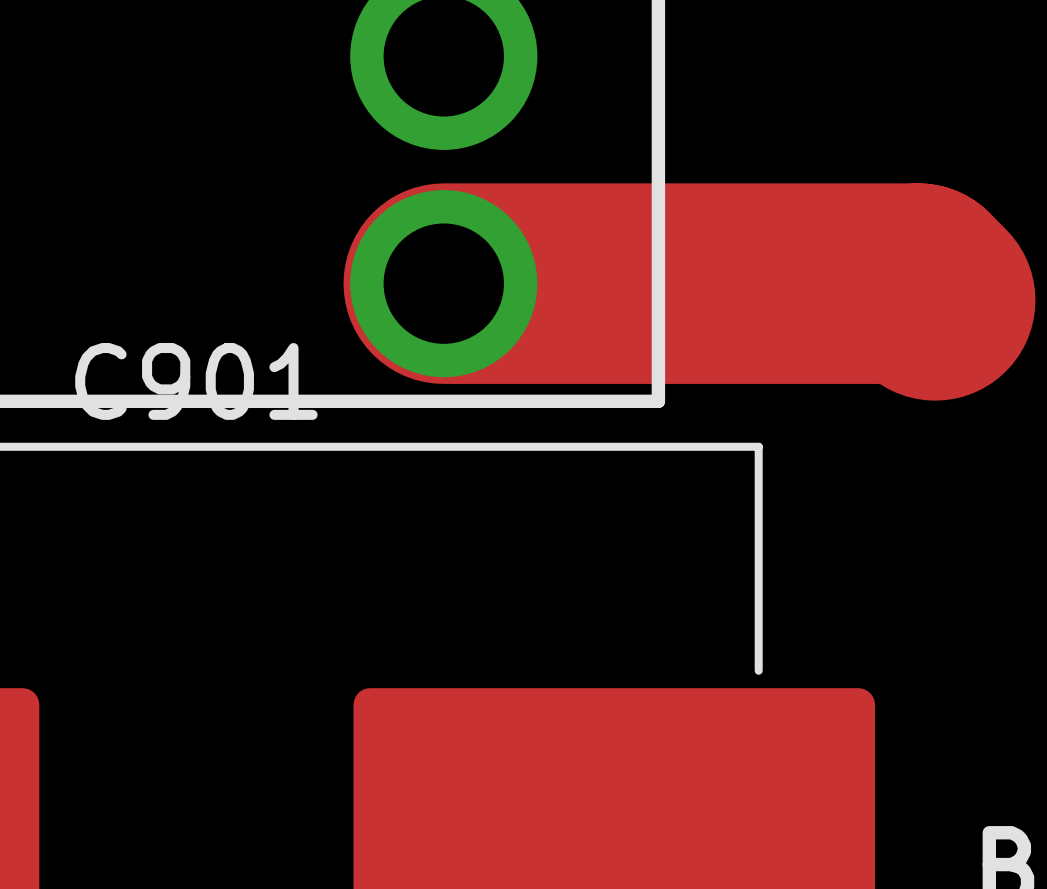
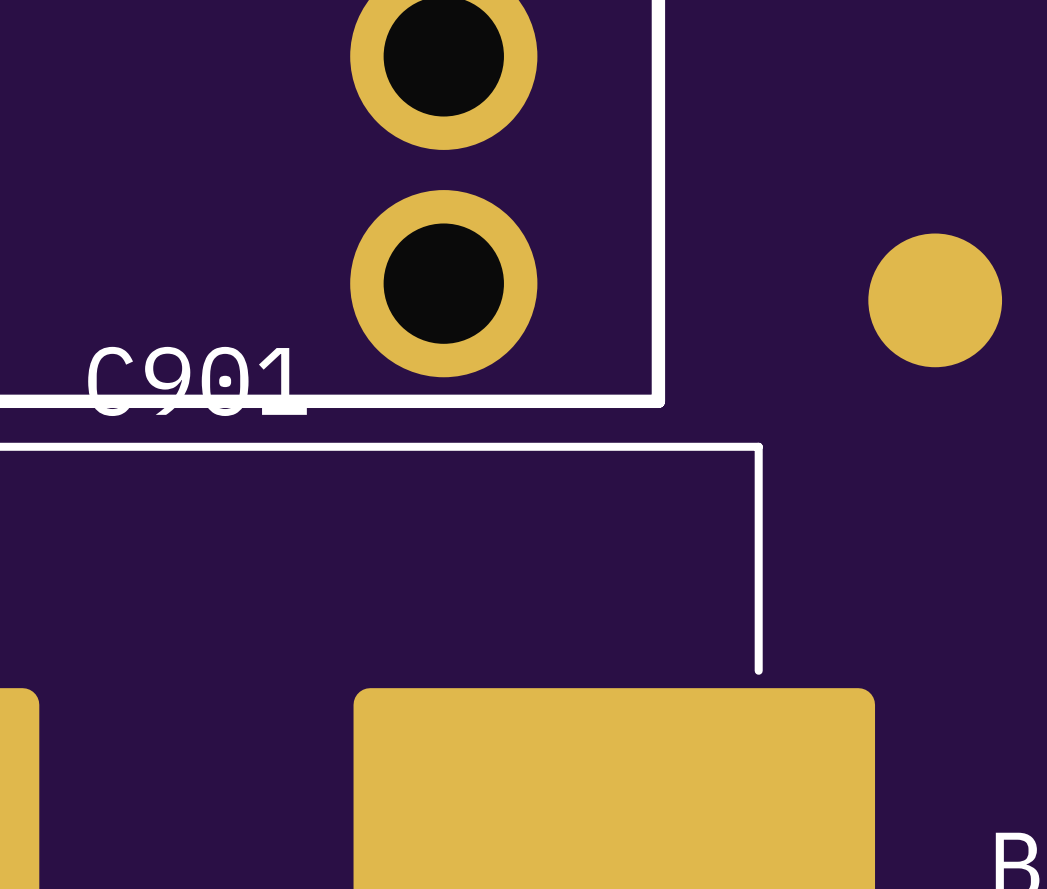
track: (443, 283) (918, 283) (935, 300) -> none

